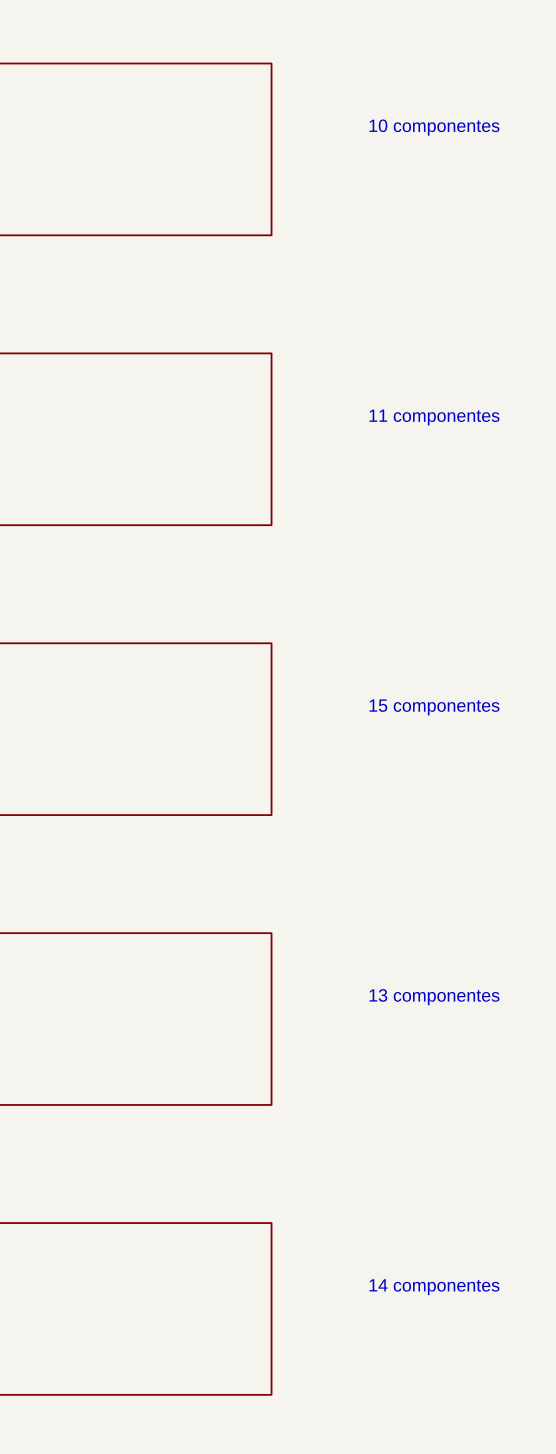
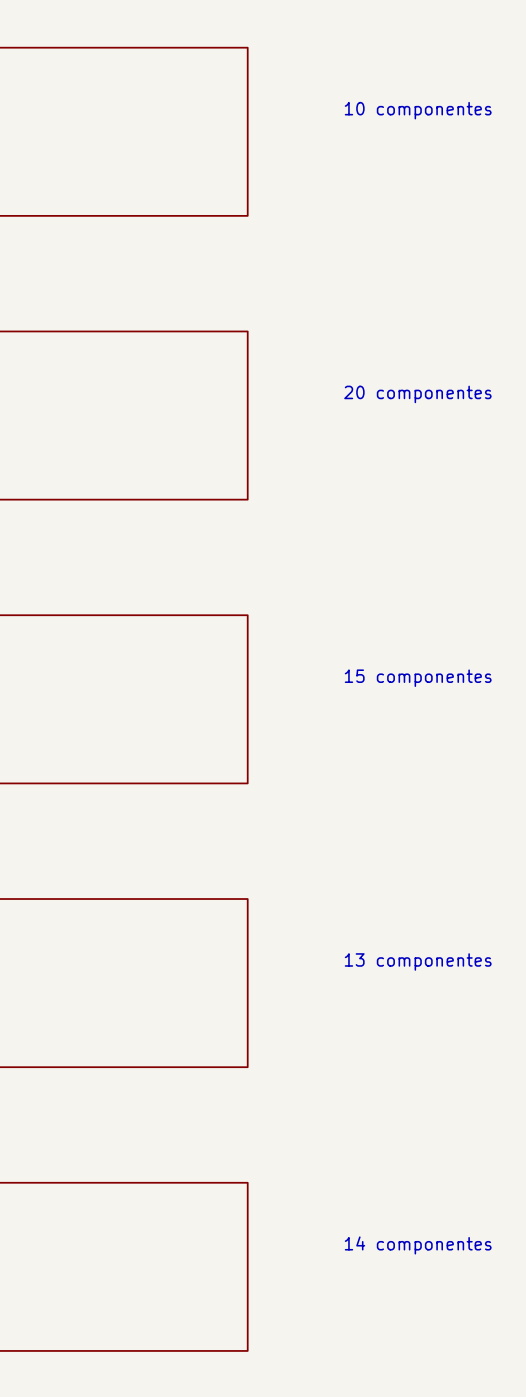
text: 11 componentes (434, 417) -> 20 componentes (417, 394)

